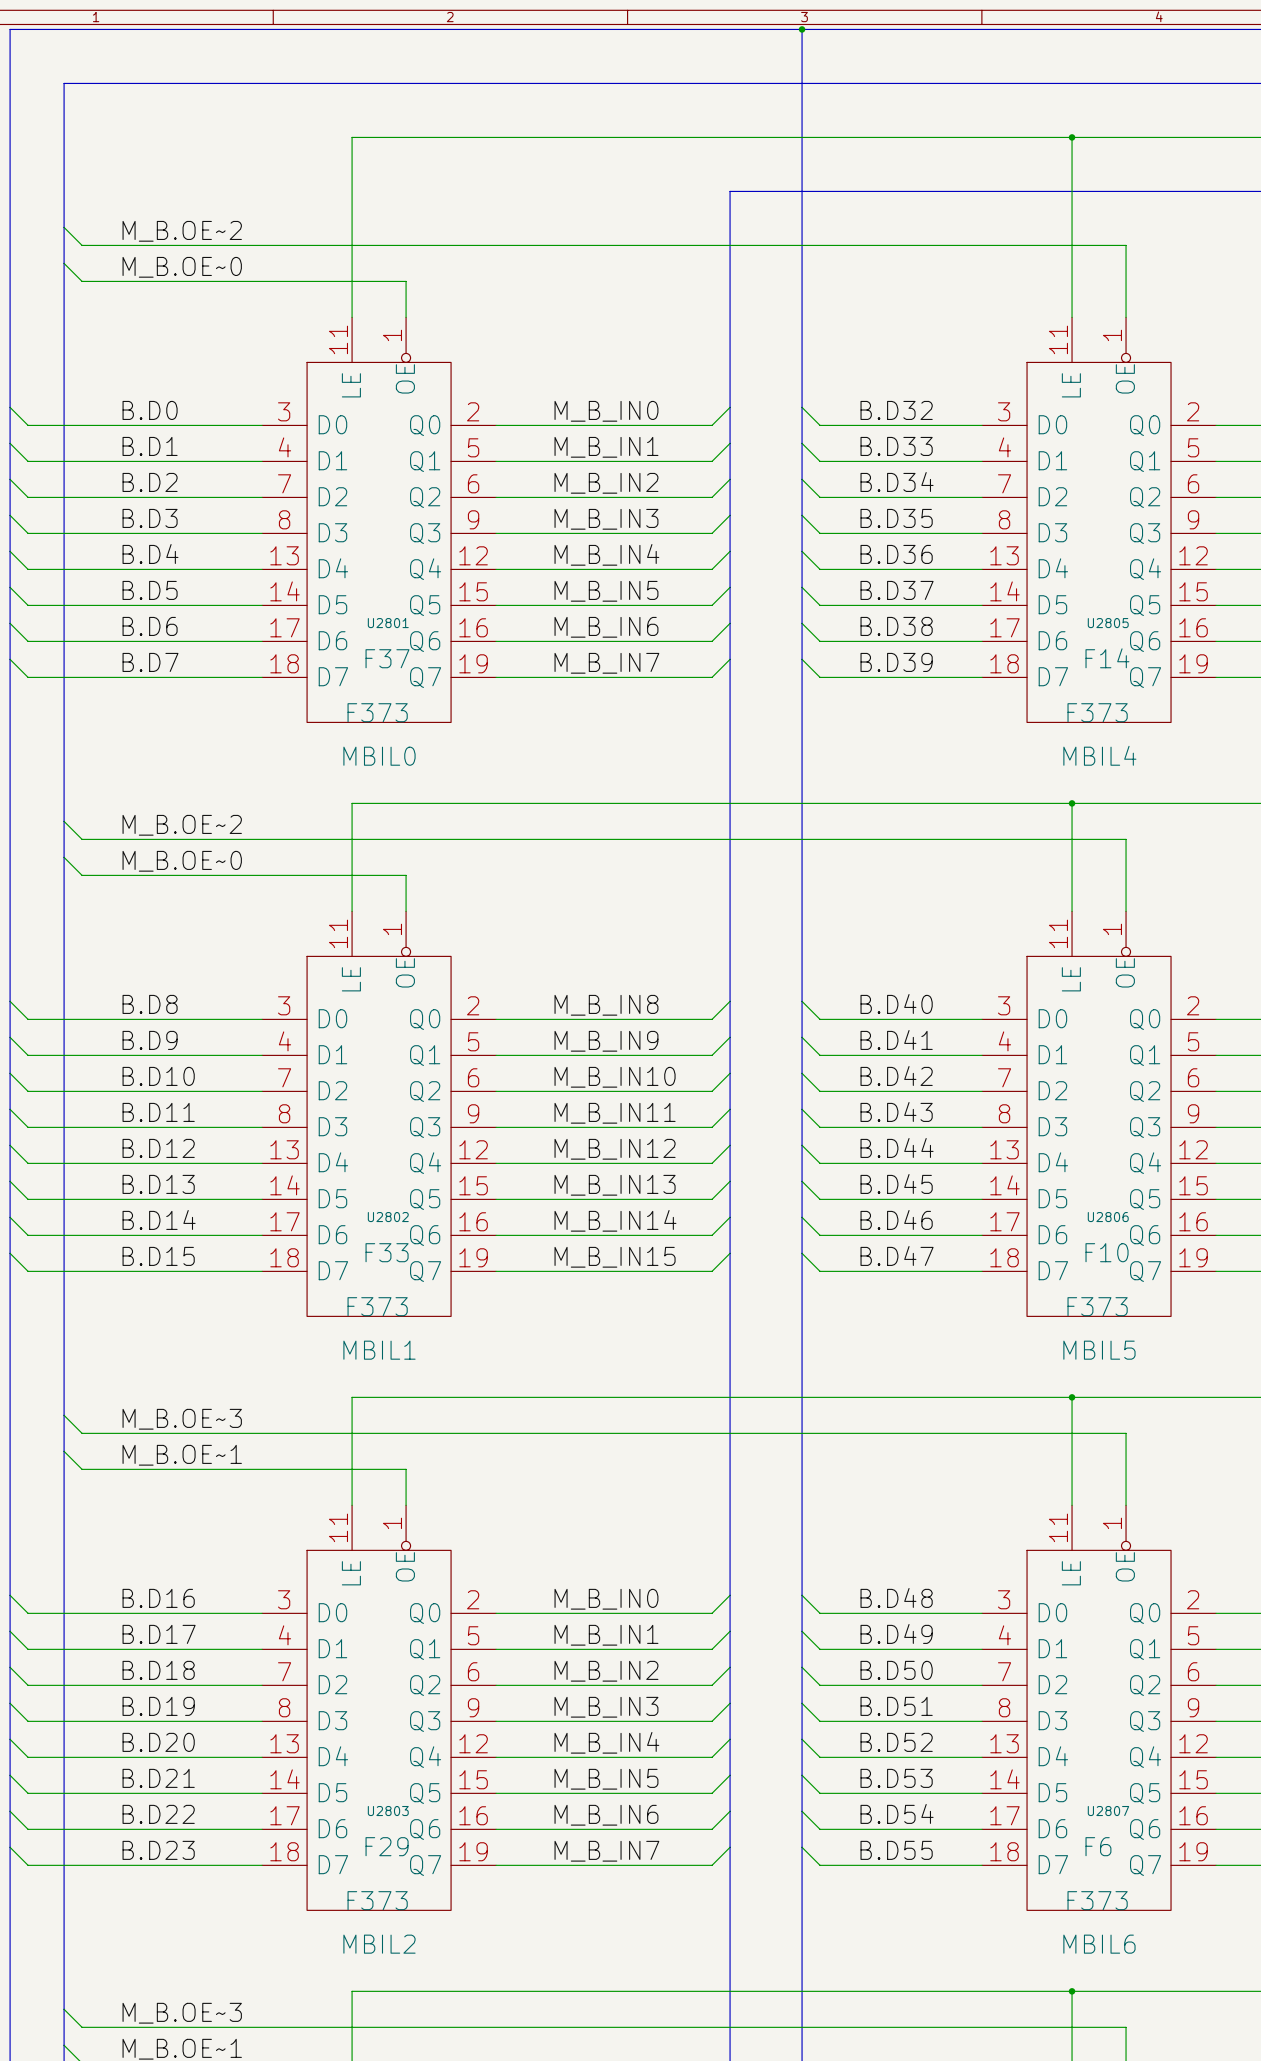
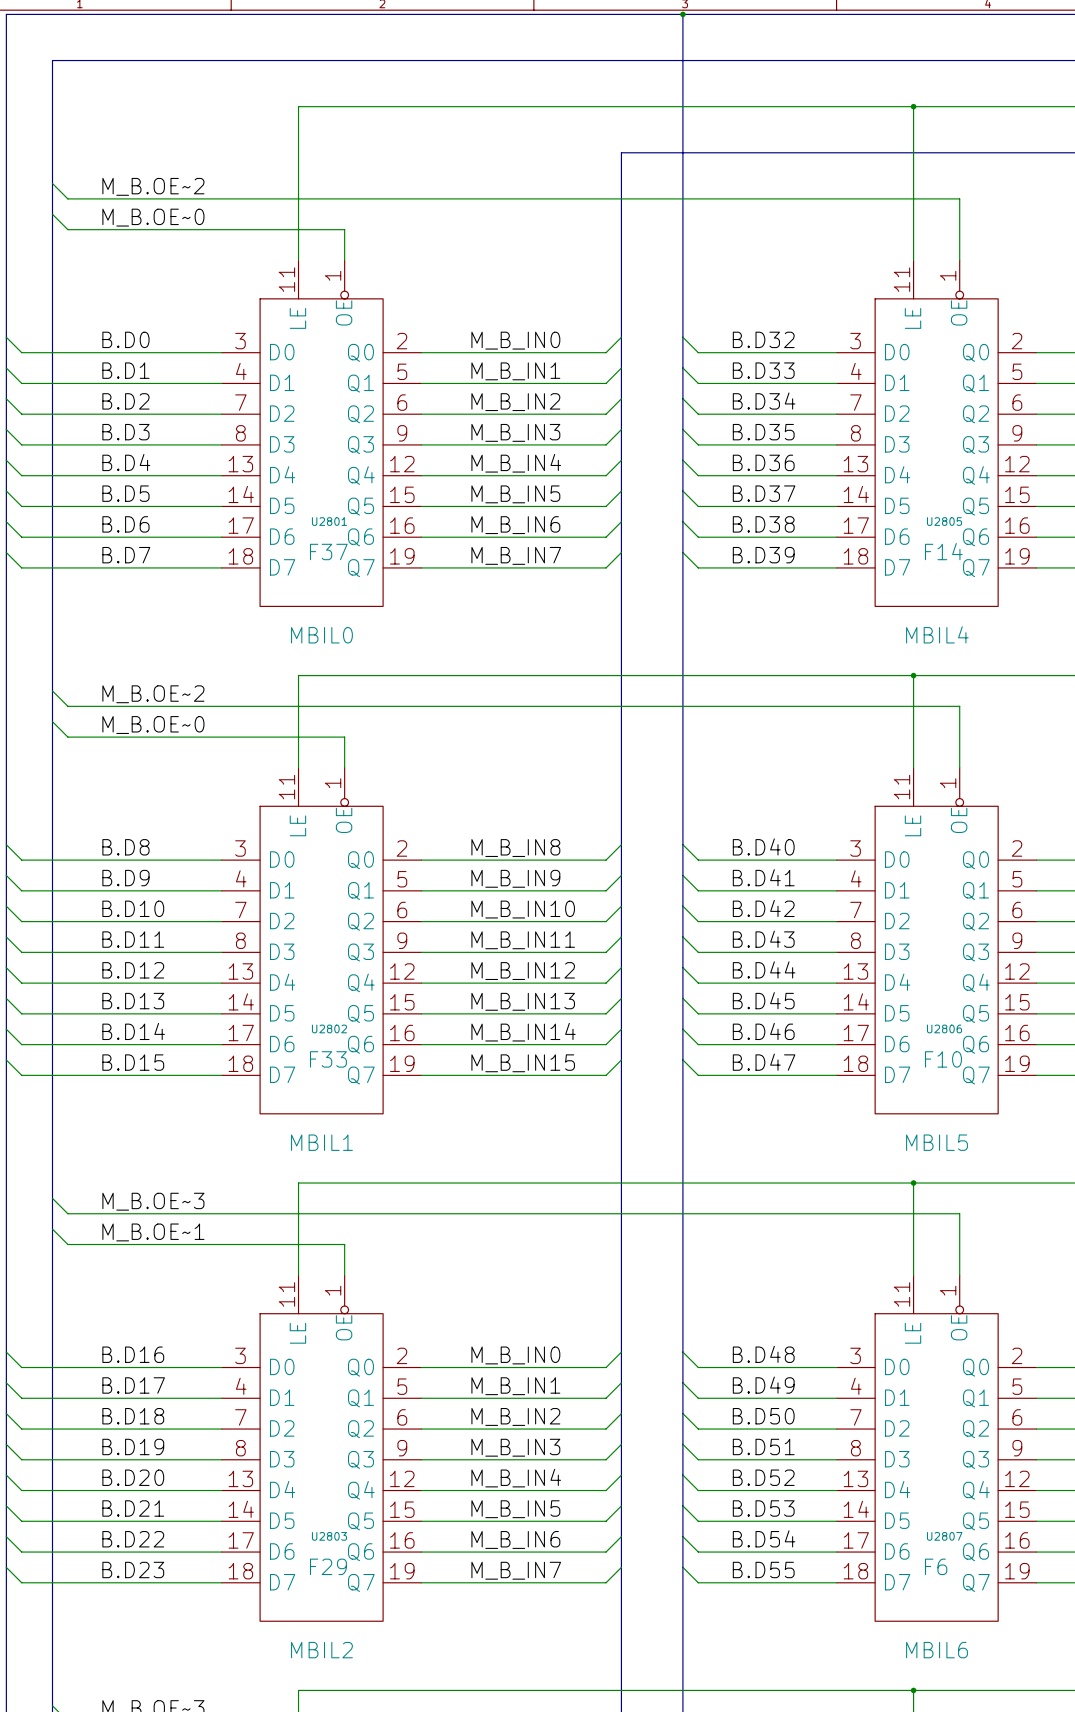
U2801 value: F373 (377, 712) -> none
U2805 value: F373 (1097, 712) -> none
U2802 value: F373 (377, 1306) -> none
U2806 value: F373 (1097, 1306) -> none
U2803 value: F373 (377, 1900) -> none
U2807 value: F373 (1097, 1900) -> none

